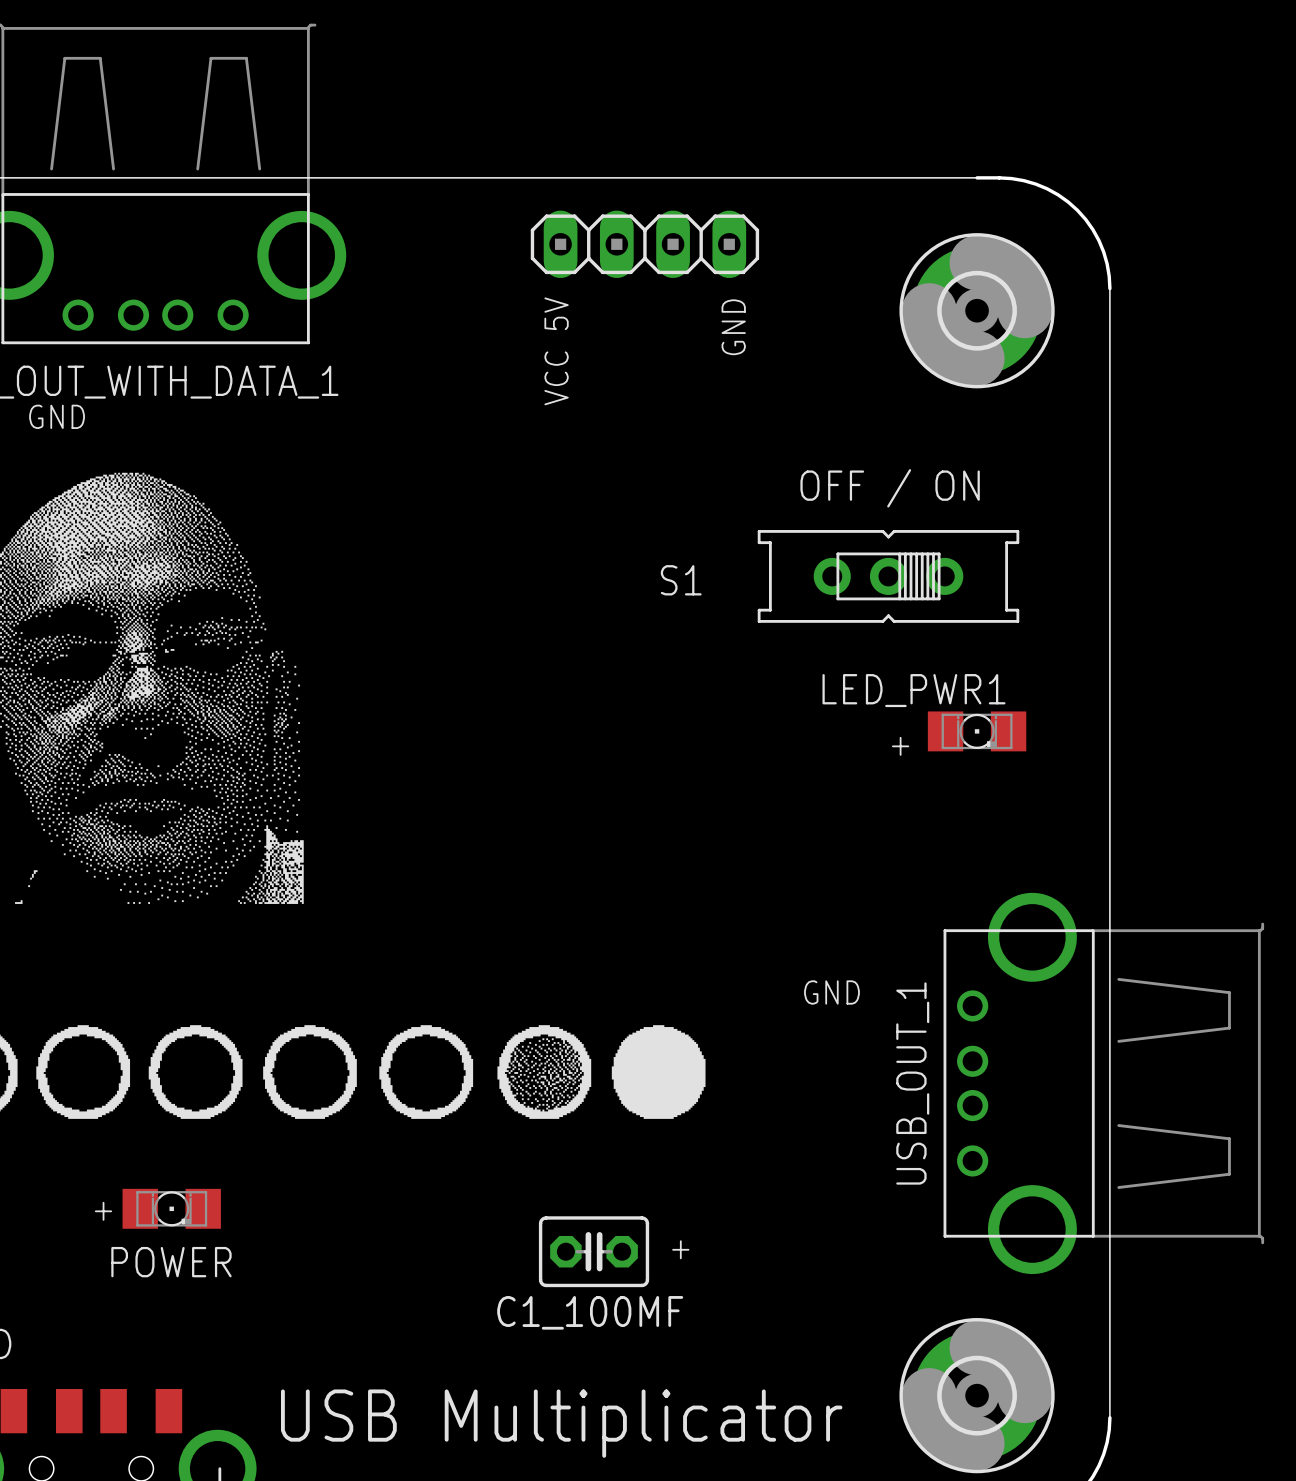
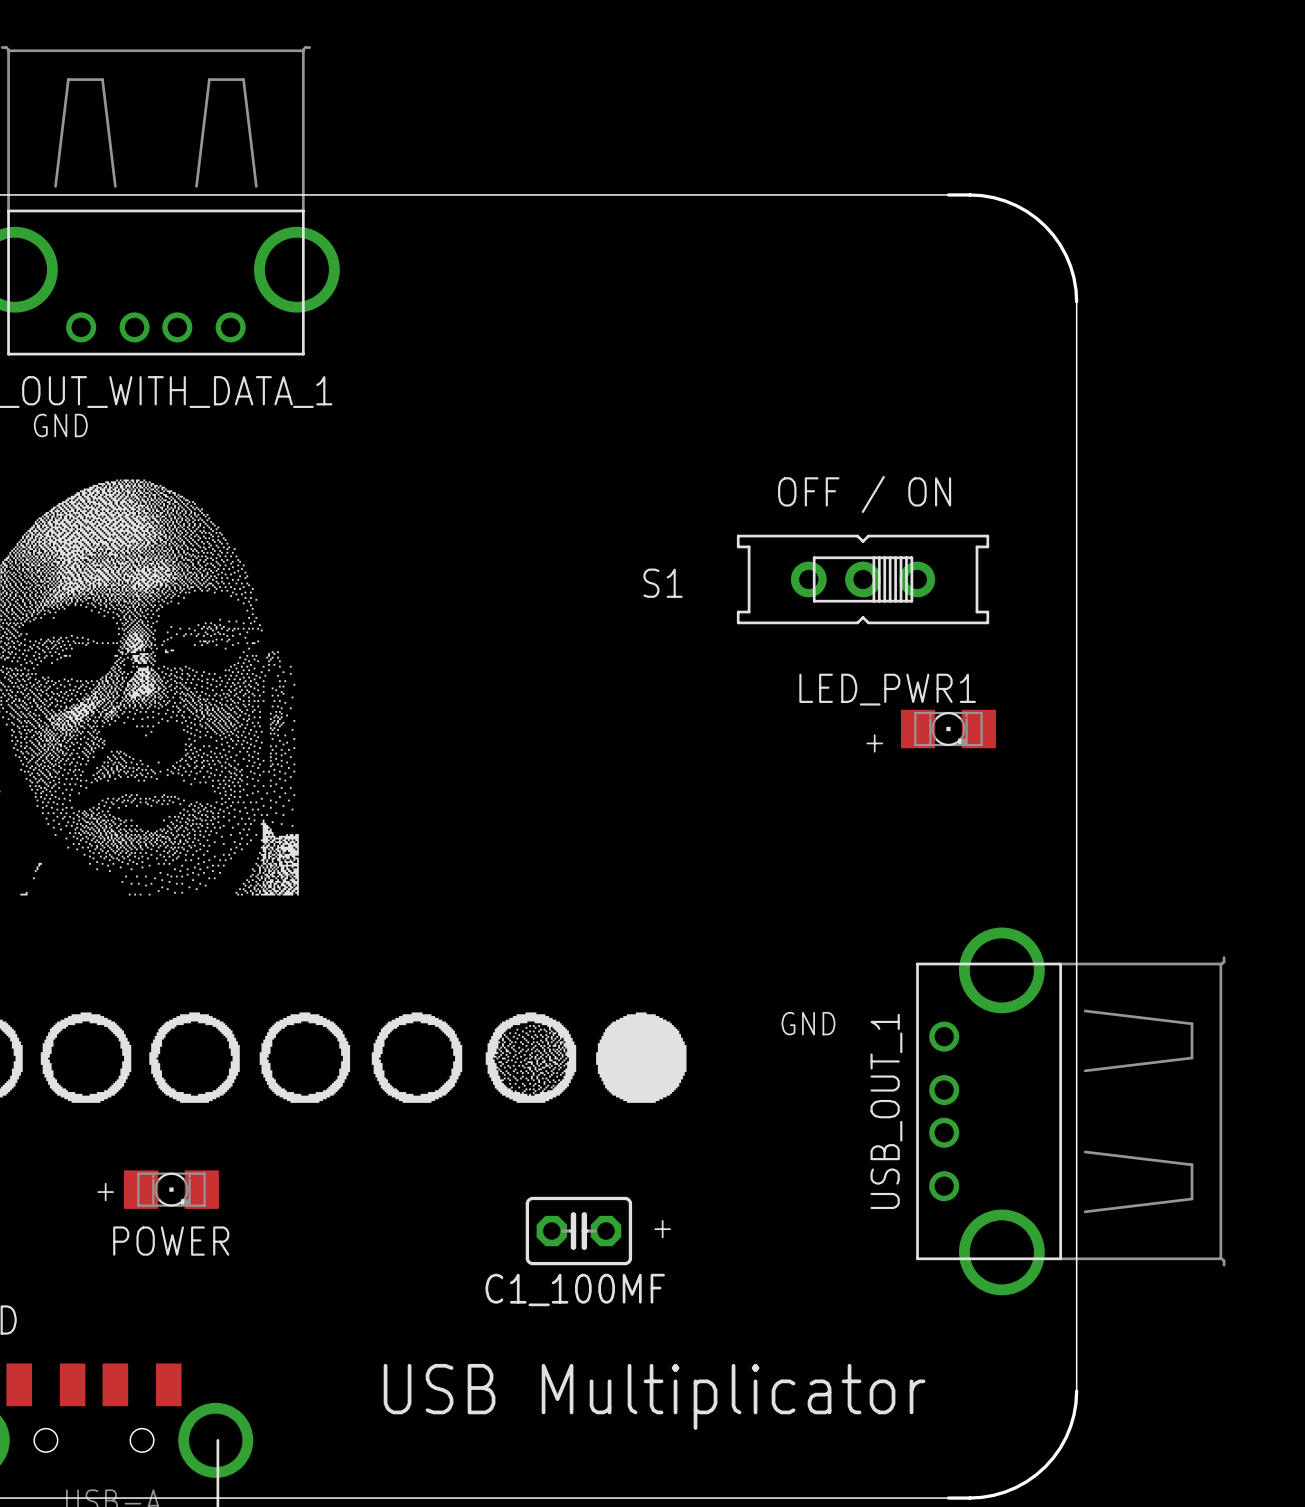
part: (644, 244) -> none
part: (977, 310) -> none
text: GND (733, 327) -> none
text: VCC 5V (556, 351) -> none
text position: GND (831, 992) -> GND (808, 1023)
USB_OUT_1 position: (1103, 1083) -> (1070, 1111)
part: (977, 1395) -> none
text position: USB Multiplicator (561, 1423) -> USB Multiplicator (654, 1396)

